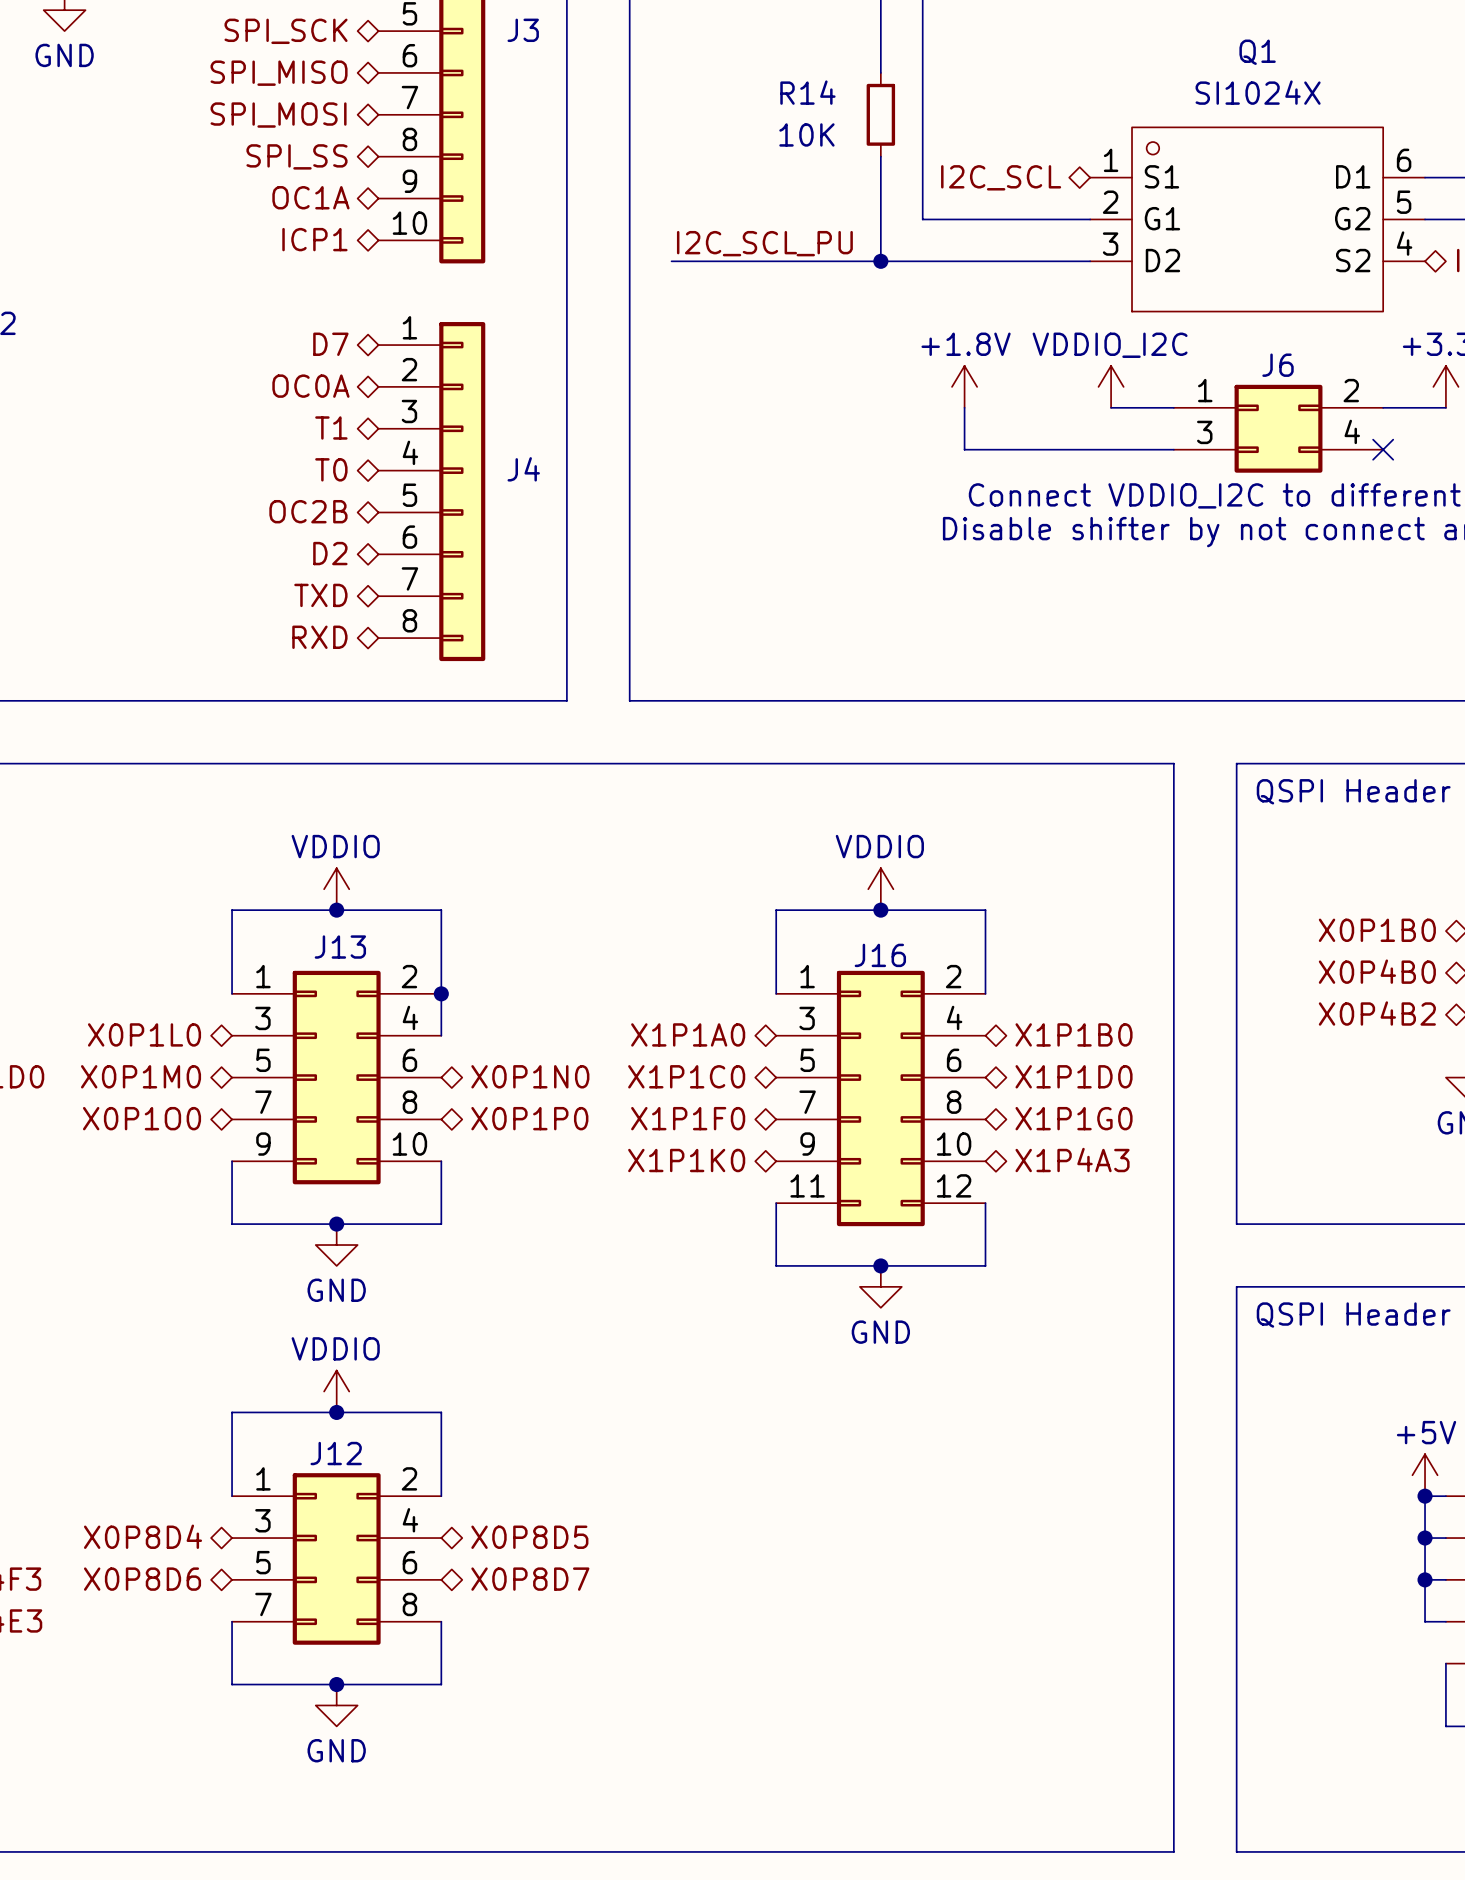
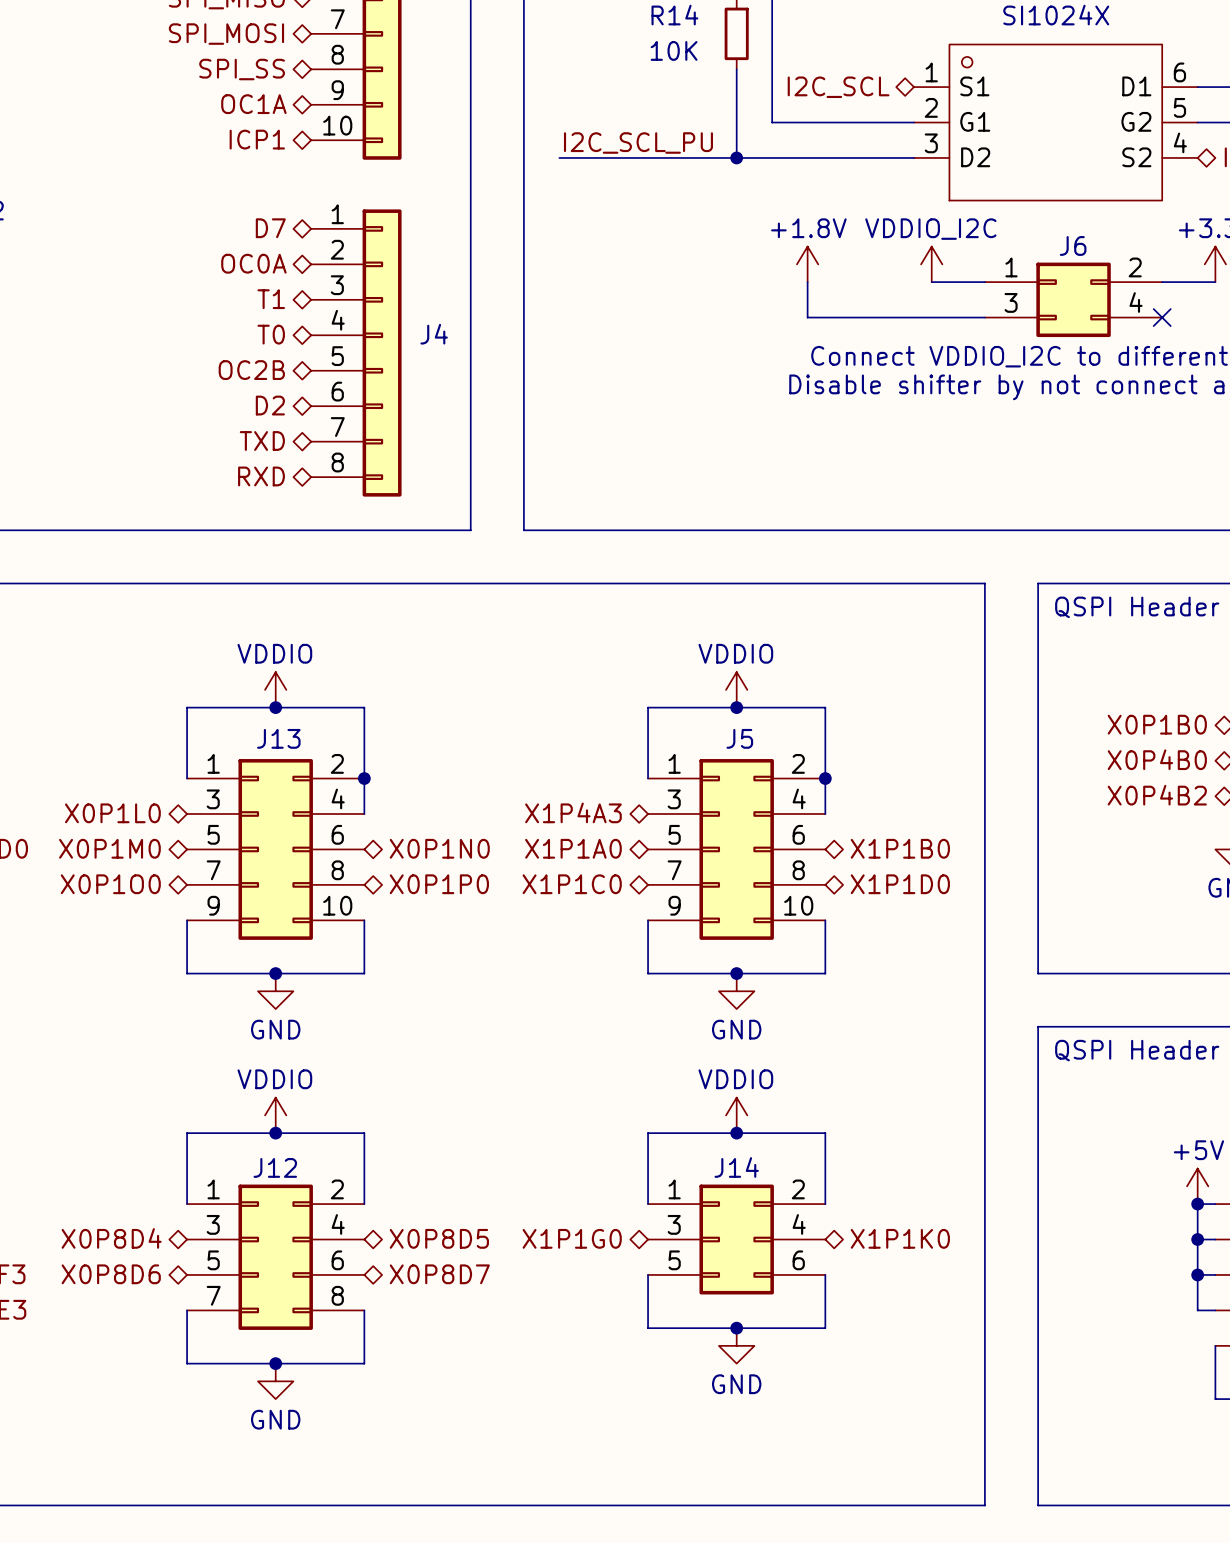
wire: none -> (825, 778) (825, 813)
junction: none -> (825, 778)
hierarchical label: X1P1A0 (688, 1034) -> X1P4A3 (573, 812)
hierarchical label: X1P1B0 (1074, 1034) -> none
hierarchical label: X1P1C0 (686, 1076) -> X1P1A0 (573, 848)
hierarchical label: X1P1D0 (1074, 1076) -> X1P1B0 (900, 848)
J5: none -> (736, 849)
J16: (880, 1098) -> none
hierarchical label: X1P1F0 (688, 1118) -> X1P1C0 (572, 884)
hierarchical label: X1P1G0 (1074, 1118) -> X1P1D0 (900, 884)
hierarchical label: X1P1K0 (686, 1160) -> none
hierarchical label: X1P4A3 (1072, 1160) -> none
wire: none -> (648, 920) (648, 955)
wire: none -> (825, 920) (825, 955)
wire: (776, 1224) (776, 1265) (985, 1265) (985, 1224) -> (648, 973) (825, 973)
junction position: (880, 1265) -> (736, 973)
power symbol position: GND (880, 1286) -> GND (736, 991)
power symbol: none -> VDDIO (736, 1115)
junction: none -> (736, 1133)
wire: none -> (648, 1204) (648, 1133) (825, 1133) (825, 1204)
hierarchical label: none -> X1P1G0 (572, 1238)
hierarchical label: none -> X1P1K0 (900, 1238)
J14: none -> (736, 1239)
wire: none -> (648, 1274) (648, 1328) (825, 1328) (825, 1274)
junction: none -> (736, 1328)
power symbol: none -> GND (736, 1345)

